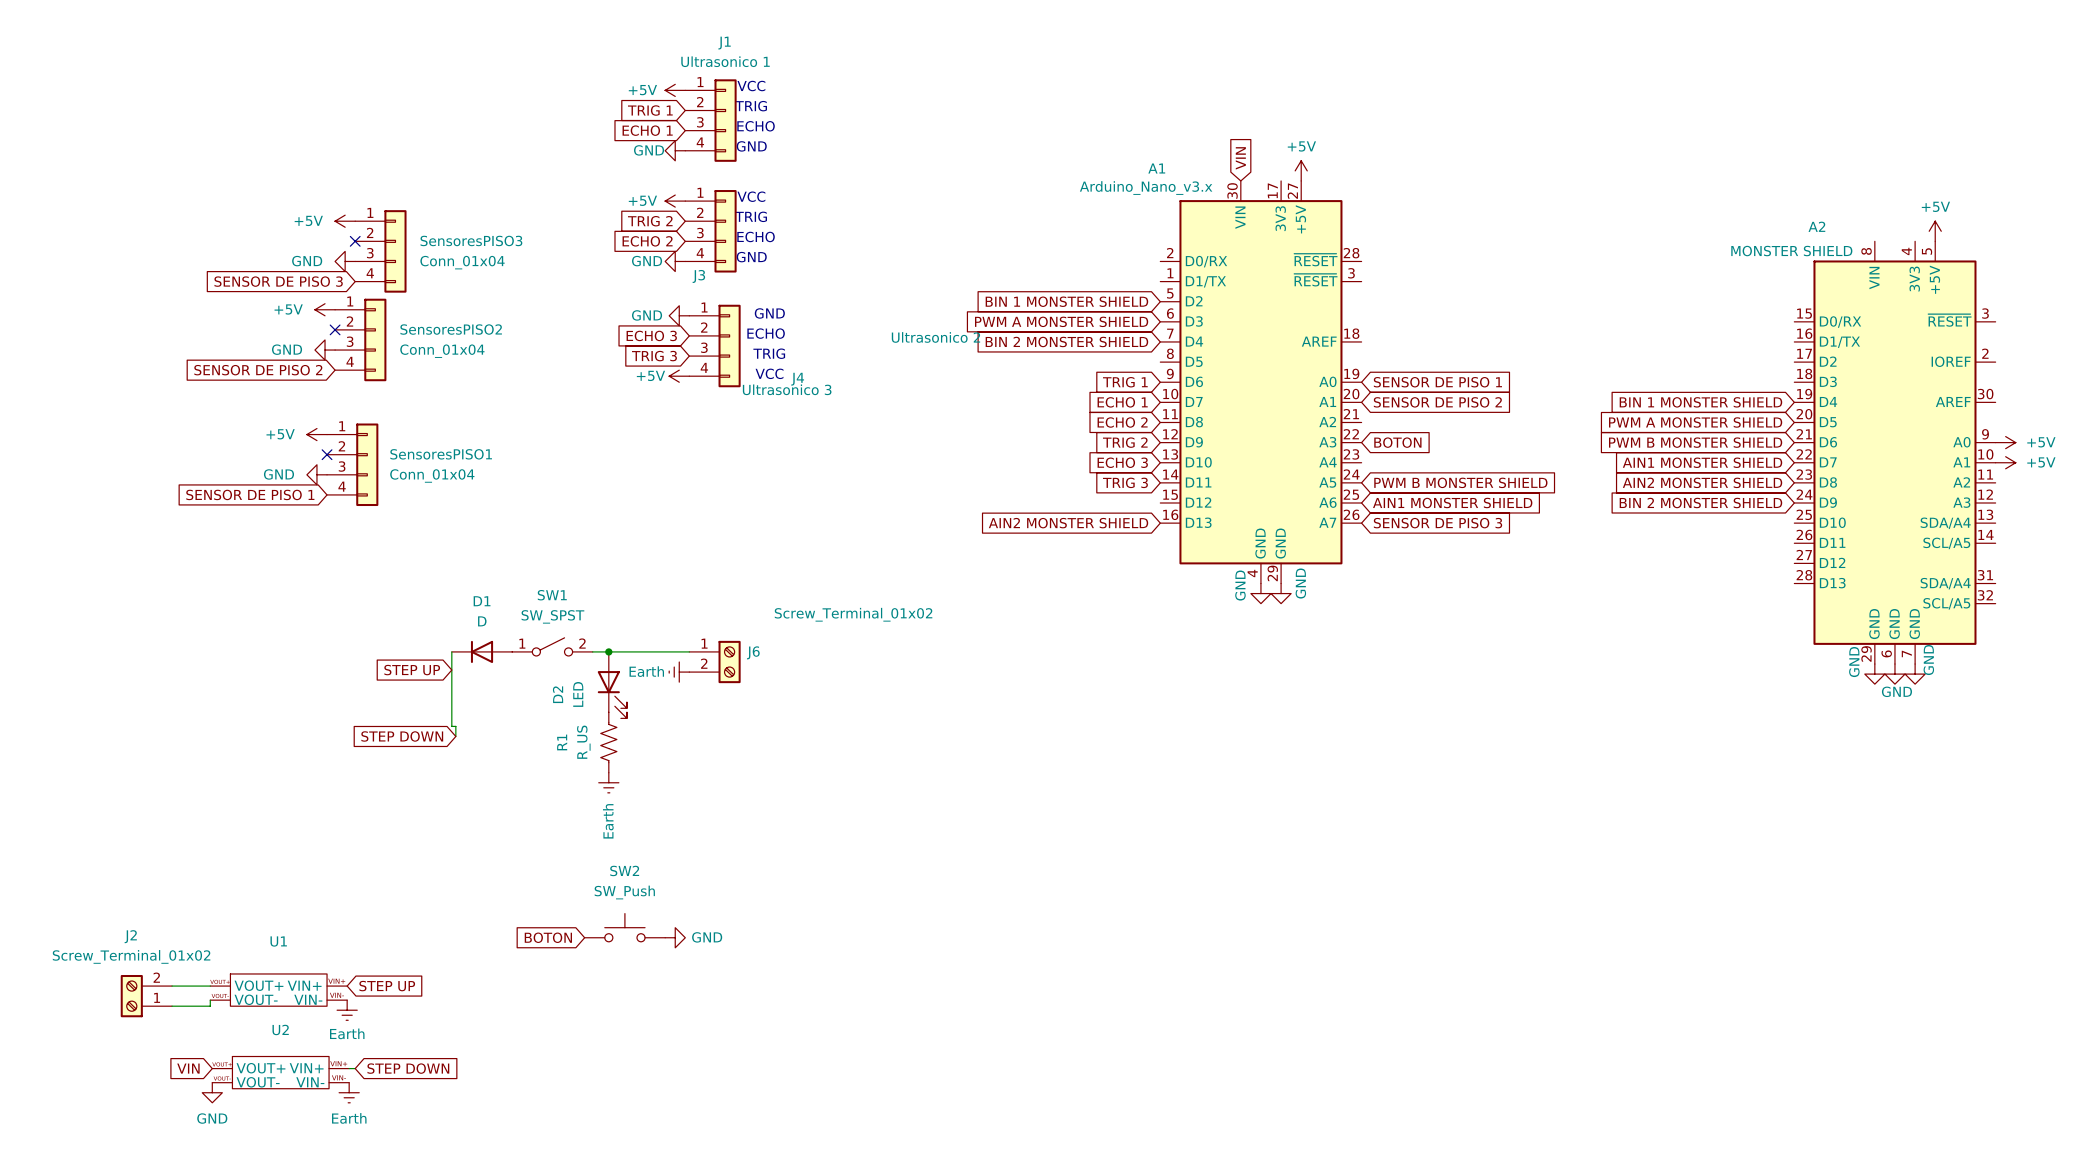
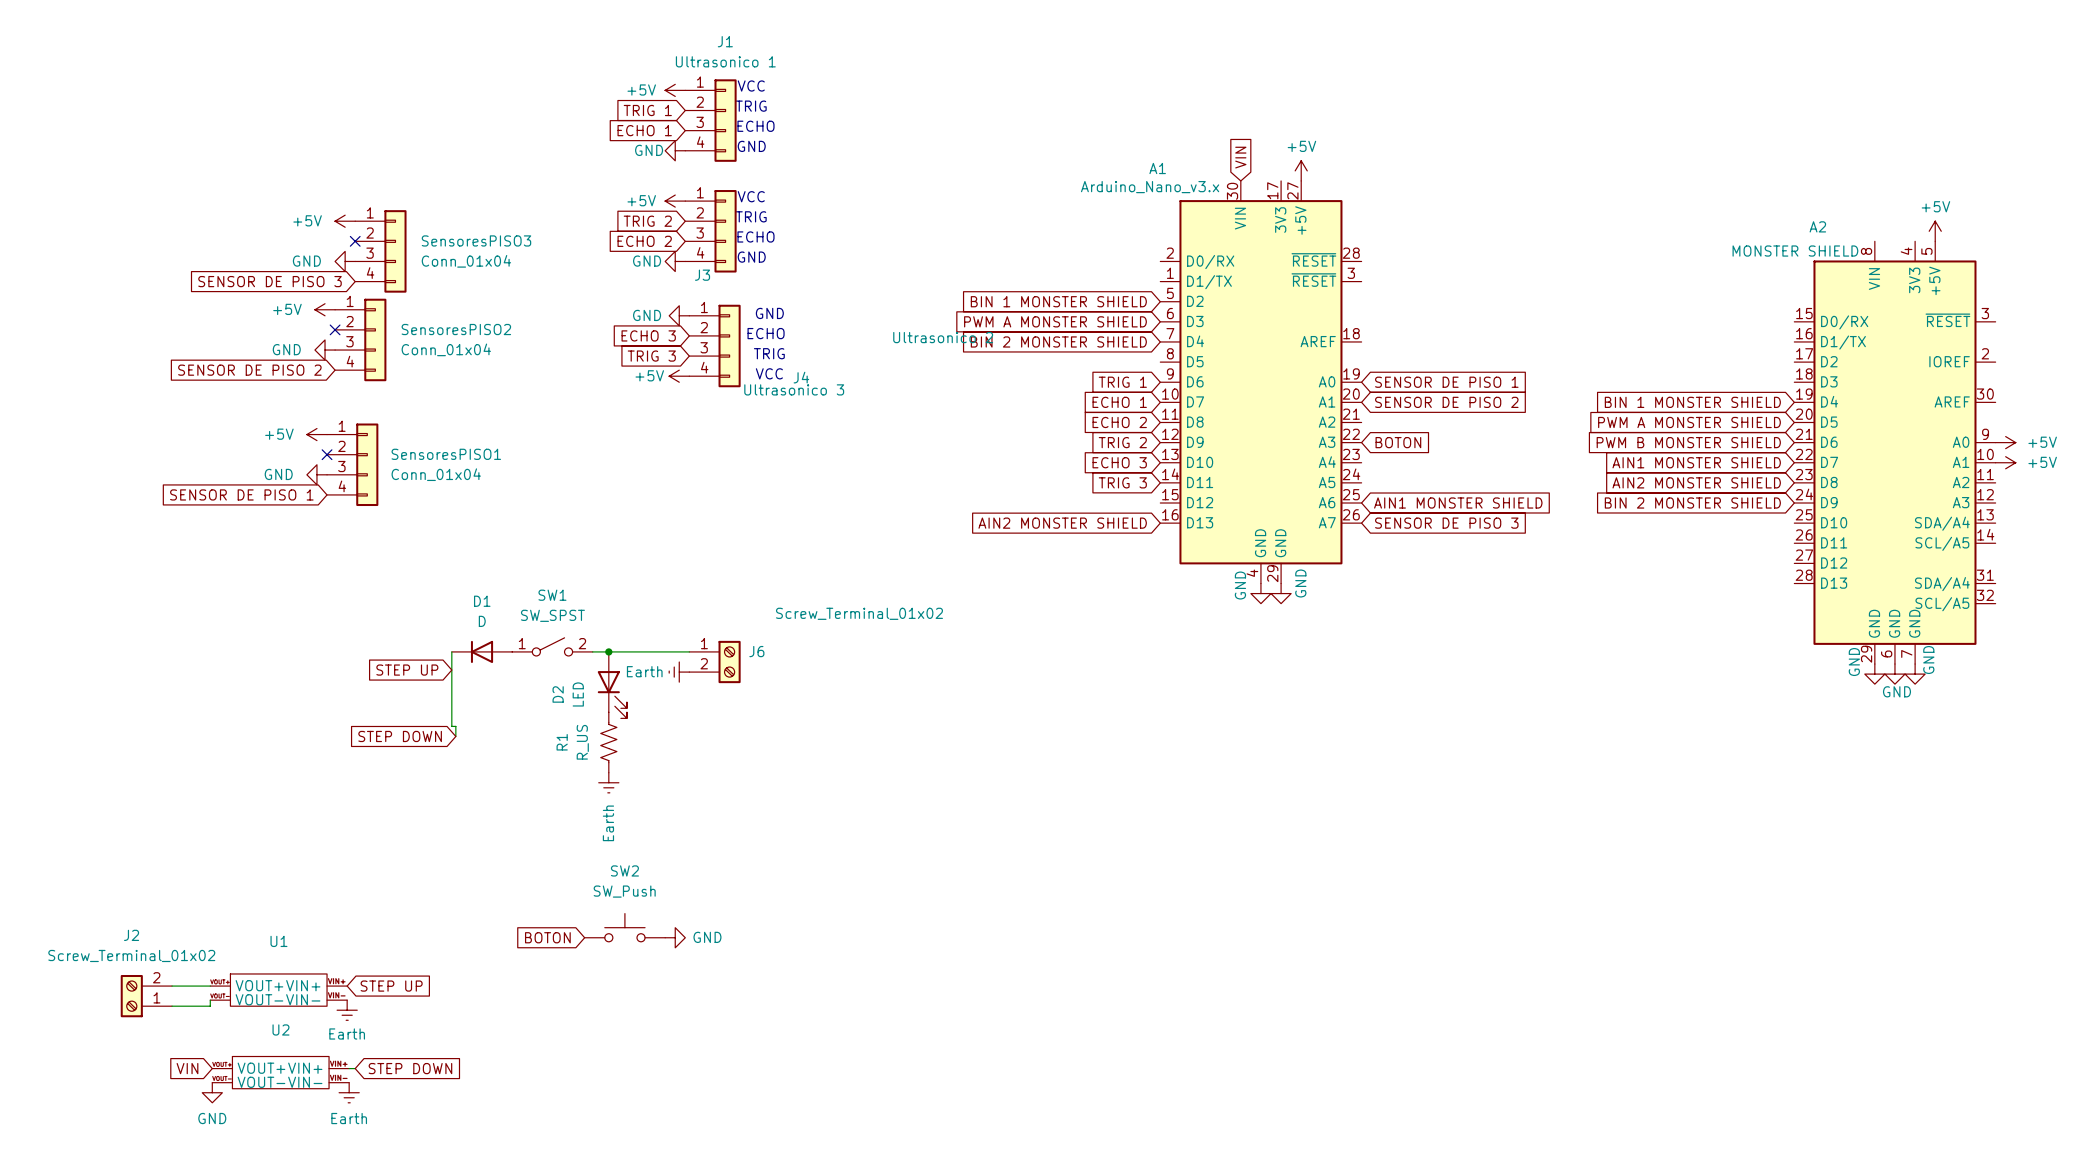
global label: PWM B MONSTER SHIELD (1460, 482) -> none

